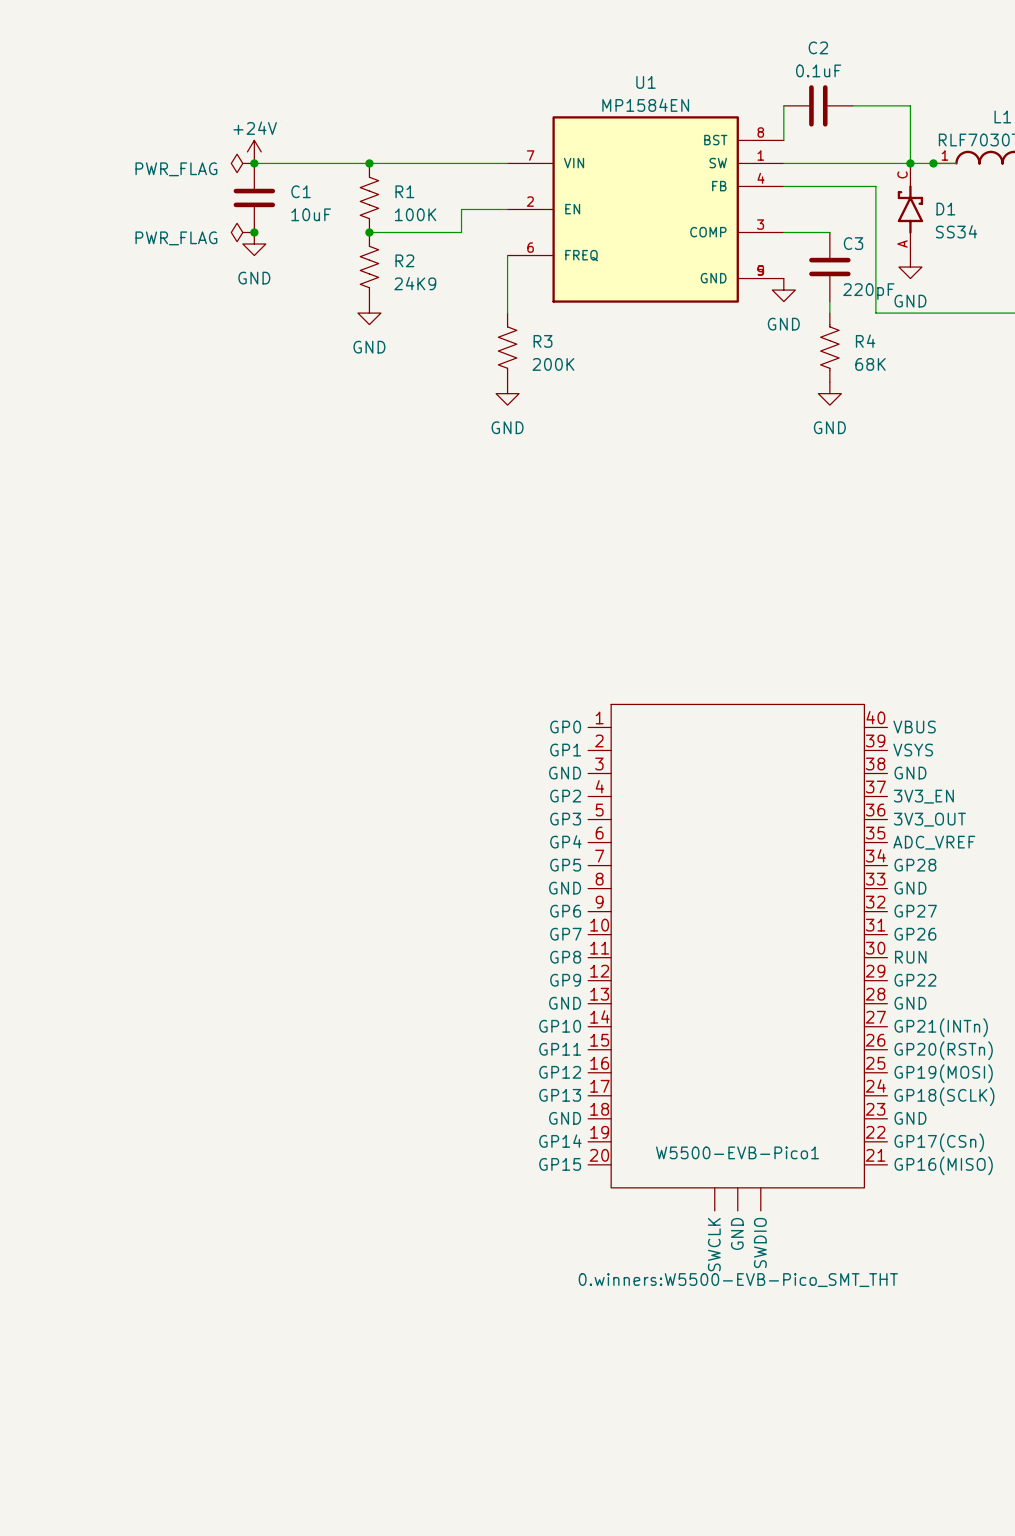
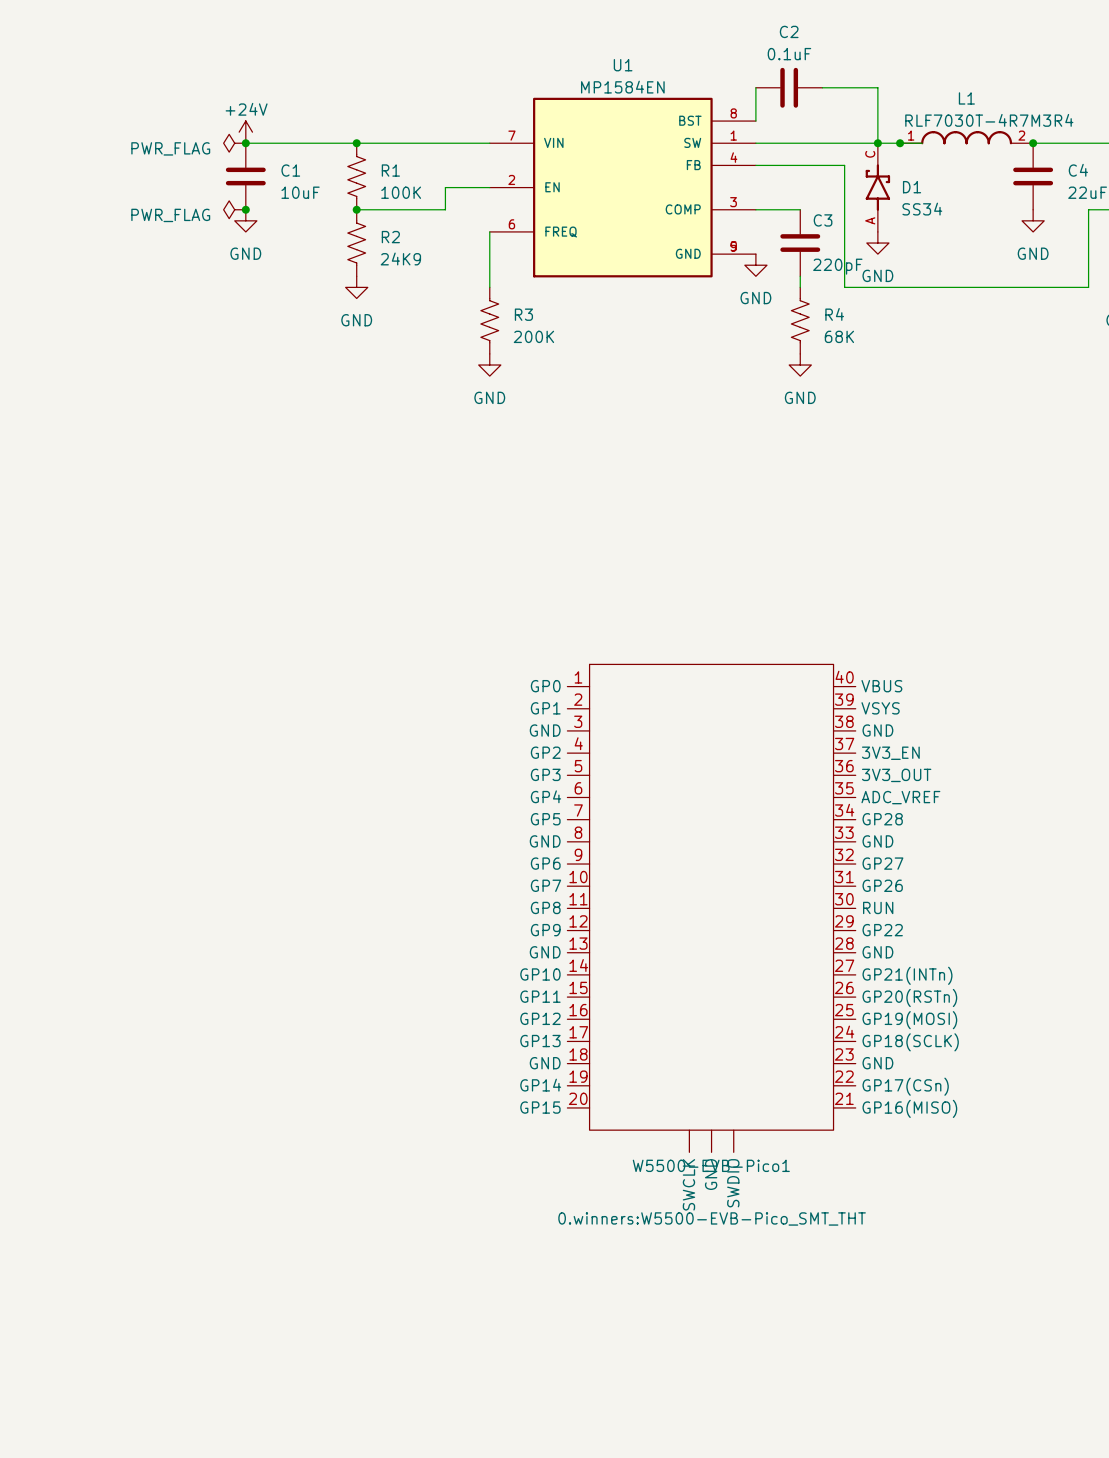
W5500-EVB-Pico1 name position: W5500-EVB-Pico1 (737, 1152) -> W5500-EVB-Pico1 (711, 1165)

